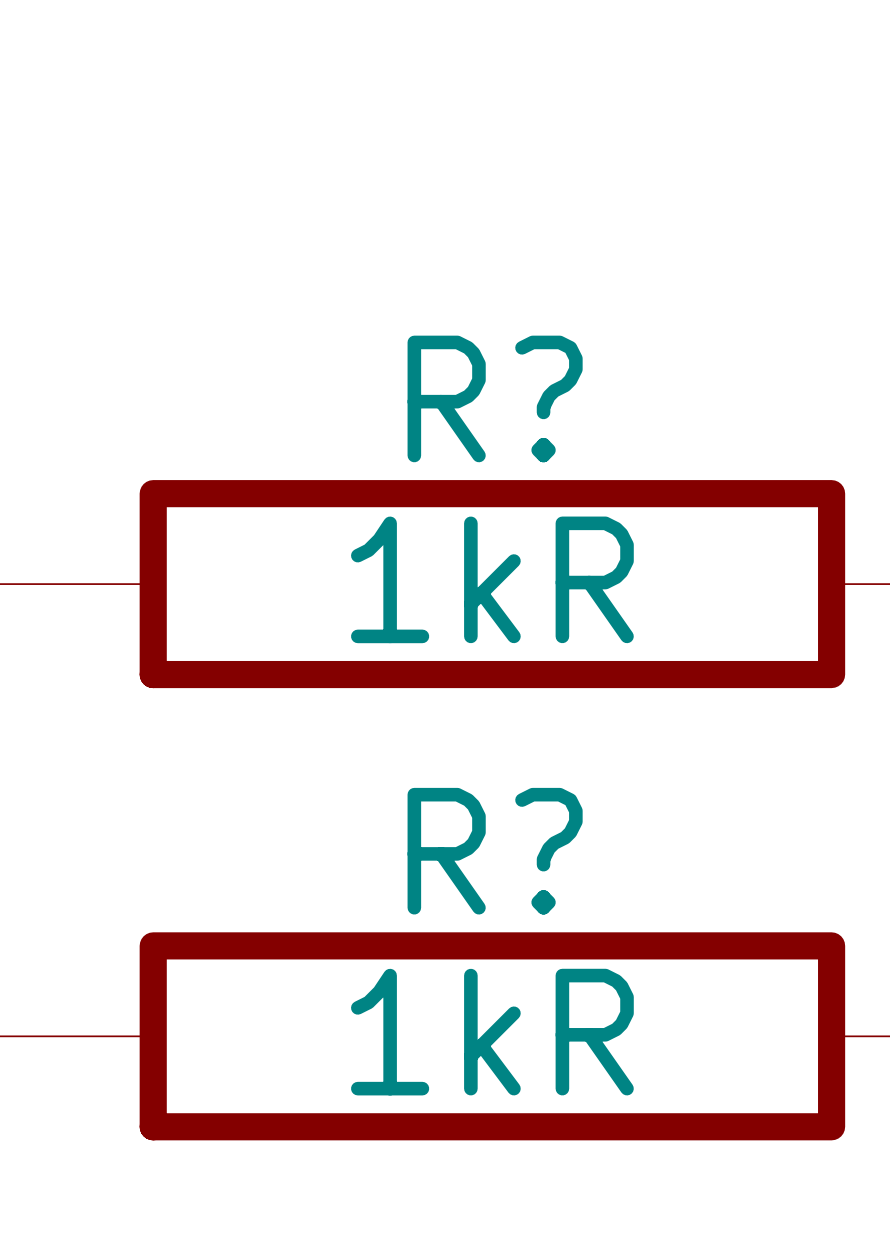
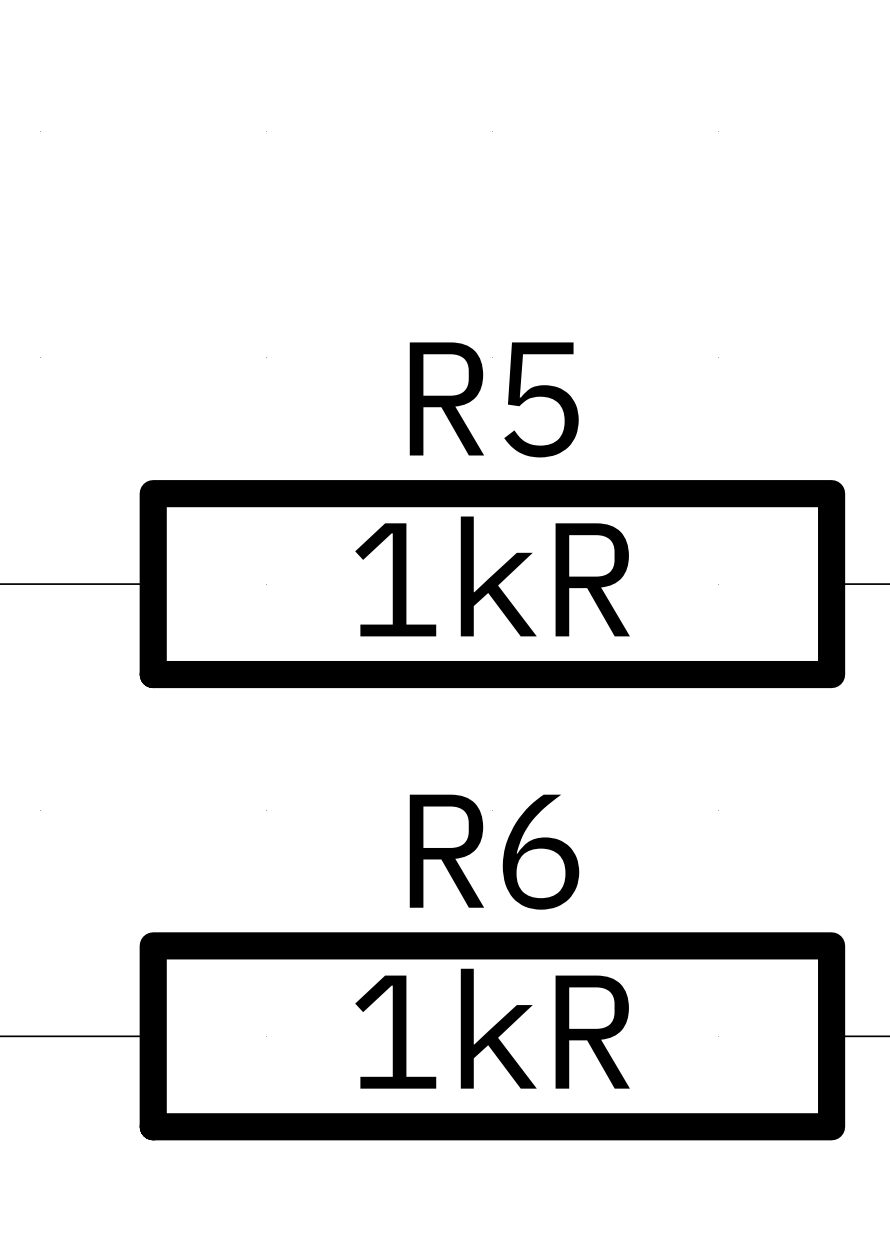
R? name: R? (495, 398) -> R5 (494, 399)
R? name: R? (495, 851) -> R6 (494, 852)

